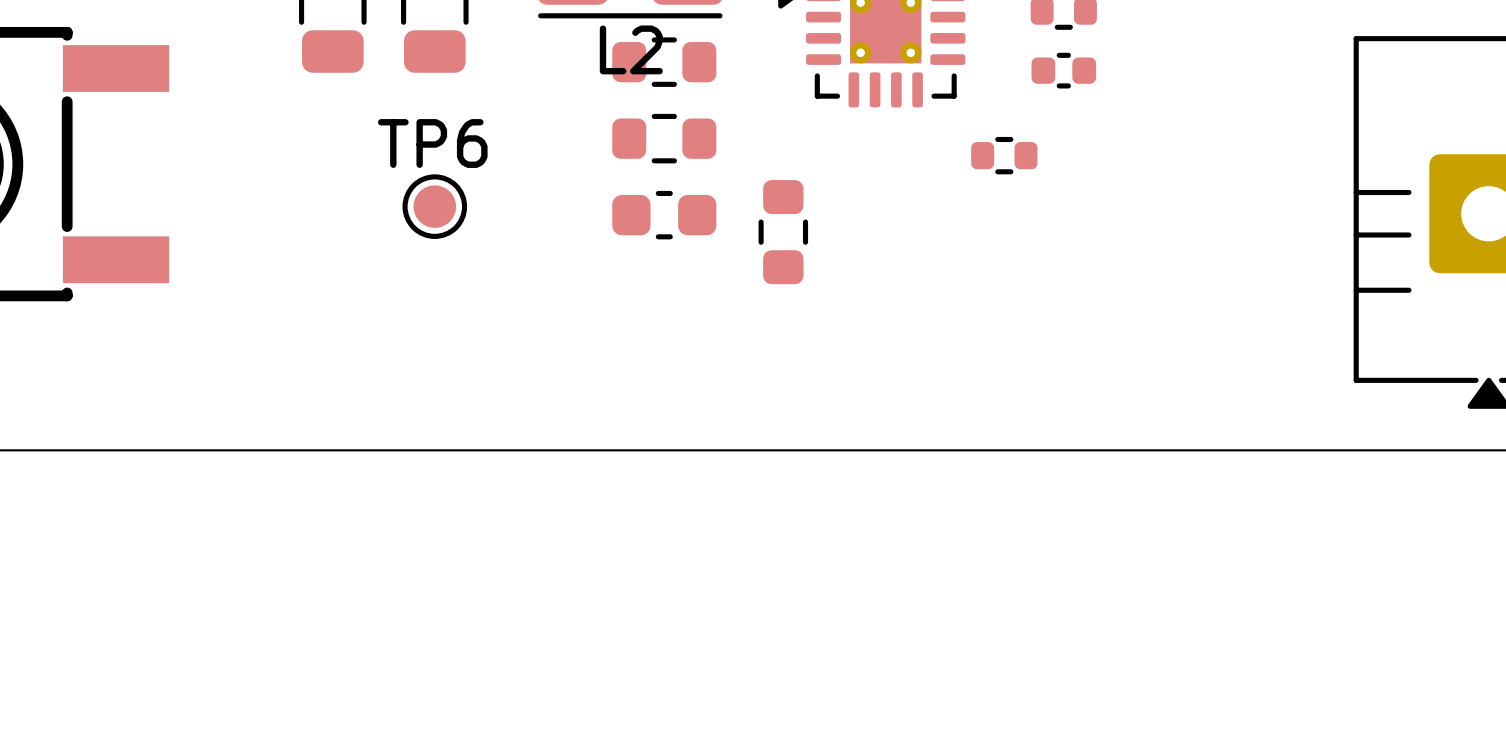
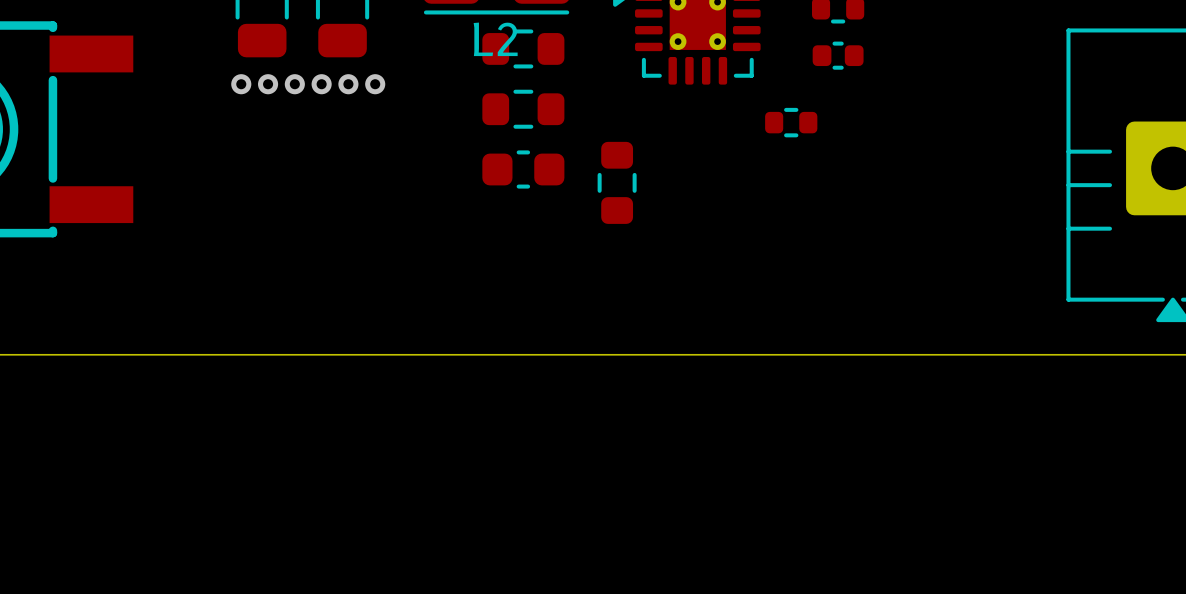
via: none -> (241, 84)
via: none -> (268, 84)
via: none -> (294, 84)
via: none -> (321, 84)
via: none -> (348, 84)
via: none -> (375, 84)
TP6: (434, 206) -> none

